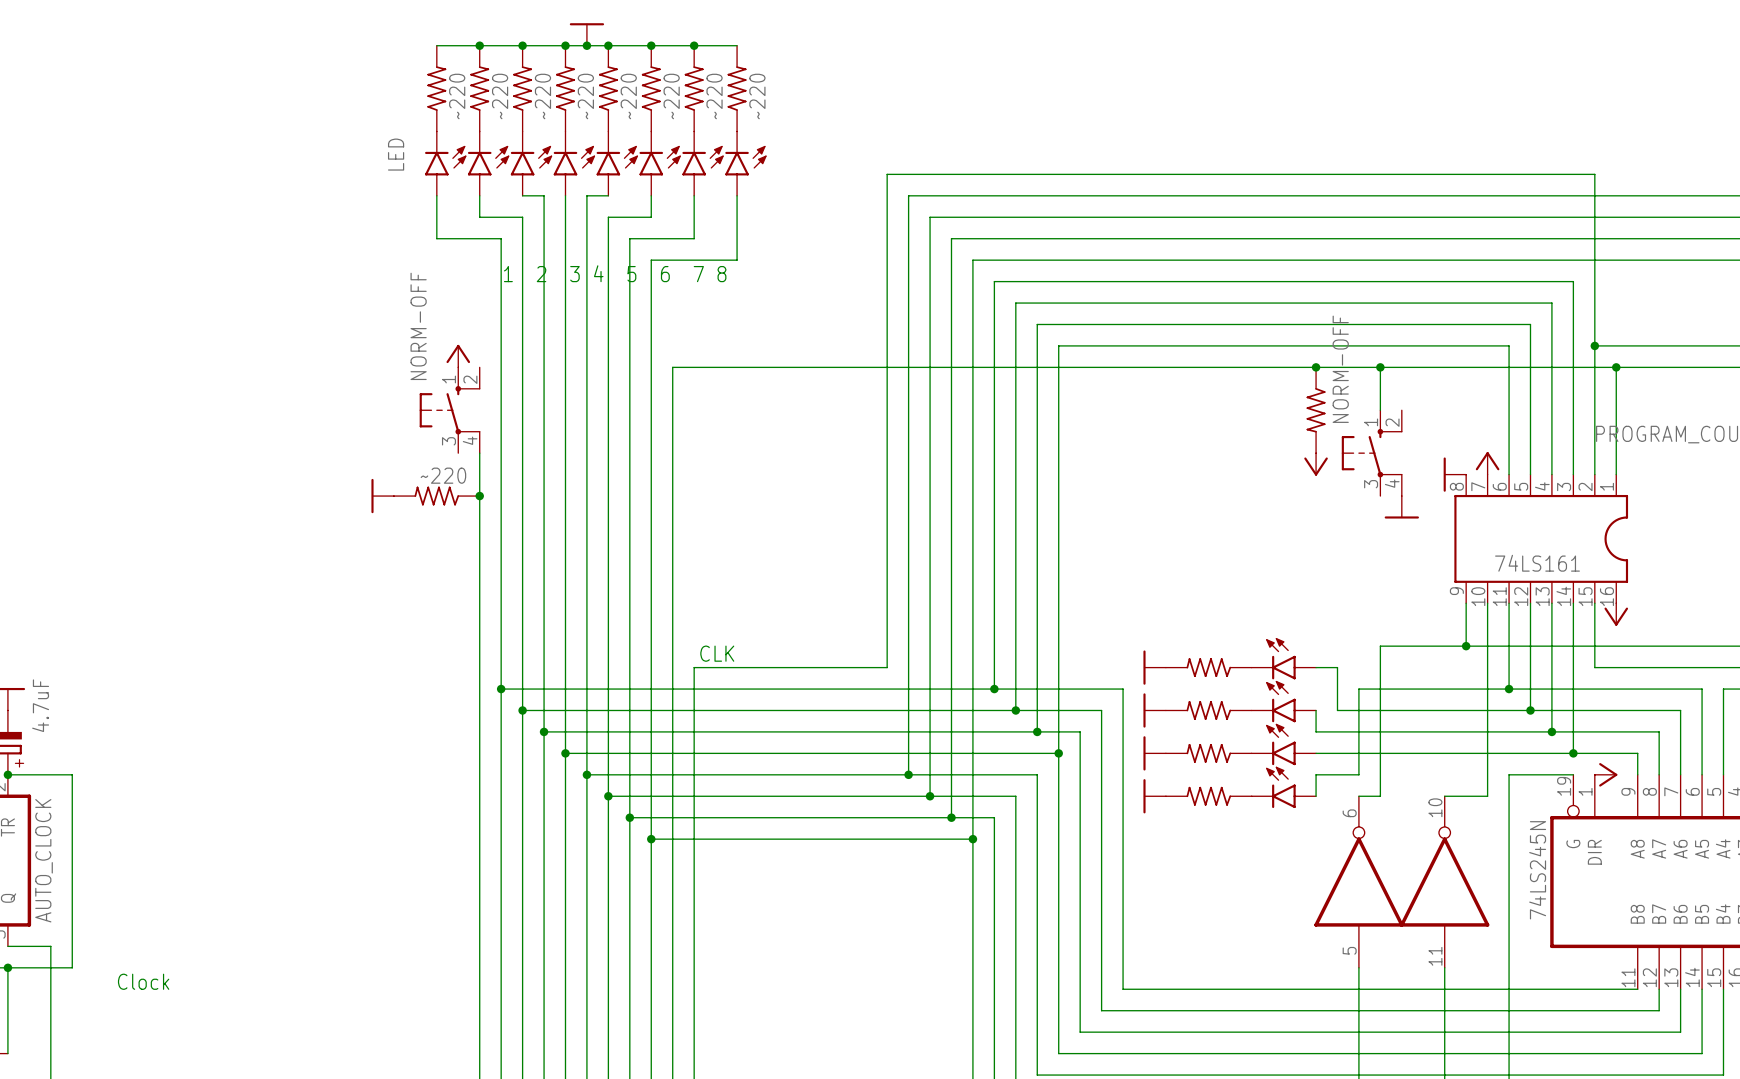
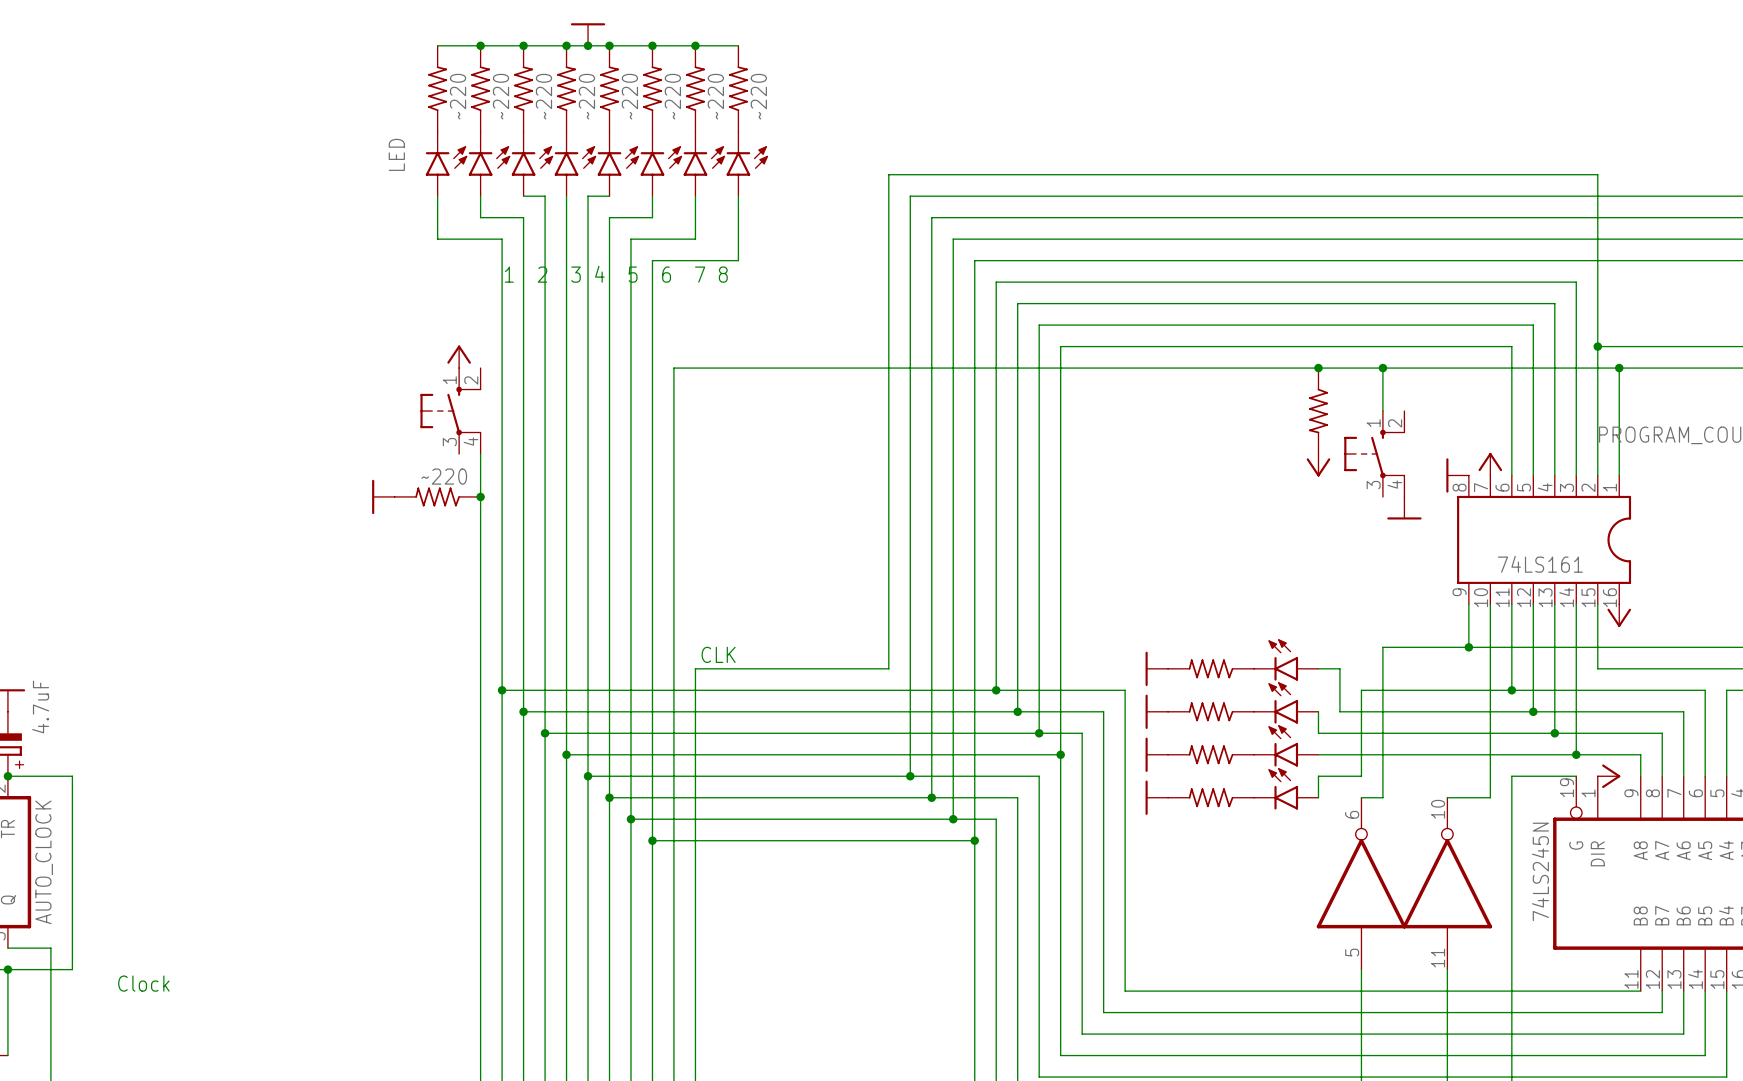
part value: NORM-OFF (418, 326) -> none
part value: NORM-OFF (1340, 369) -> none

